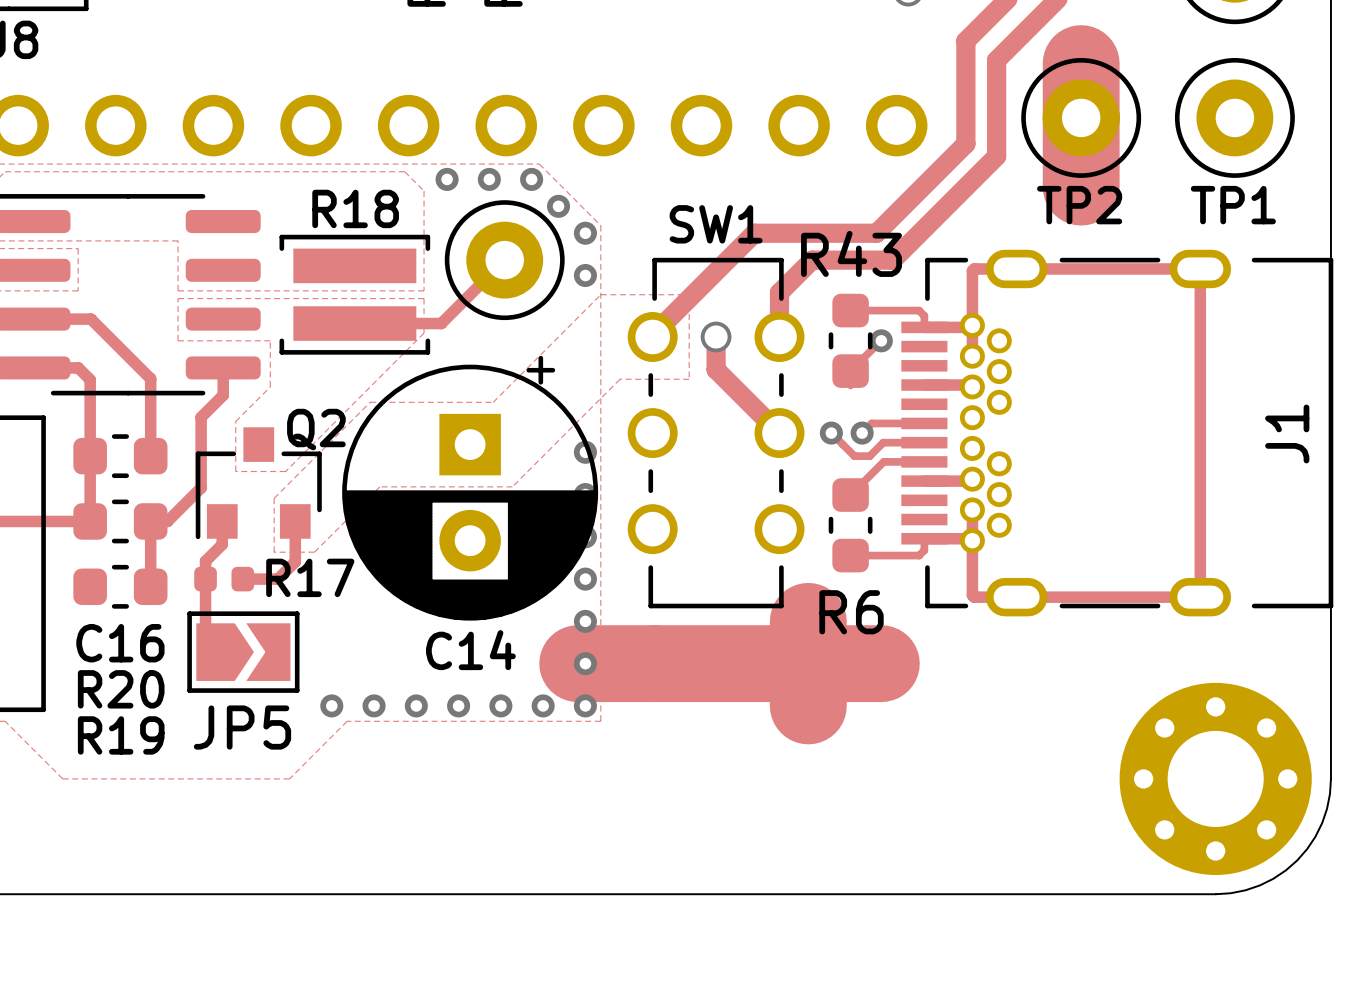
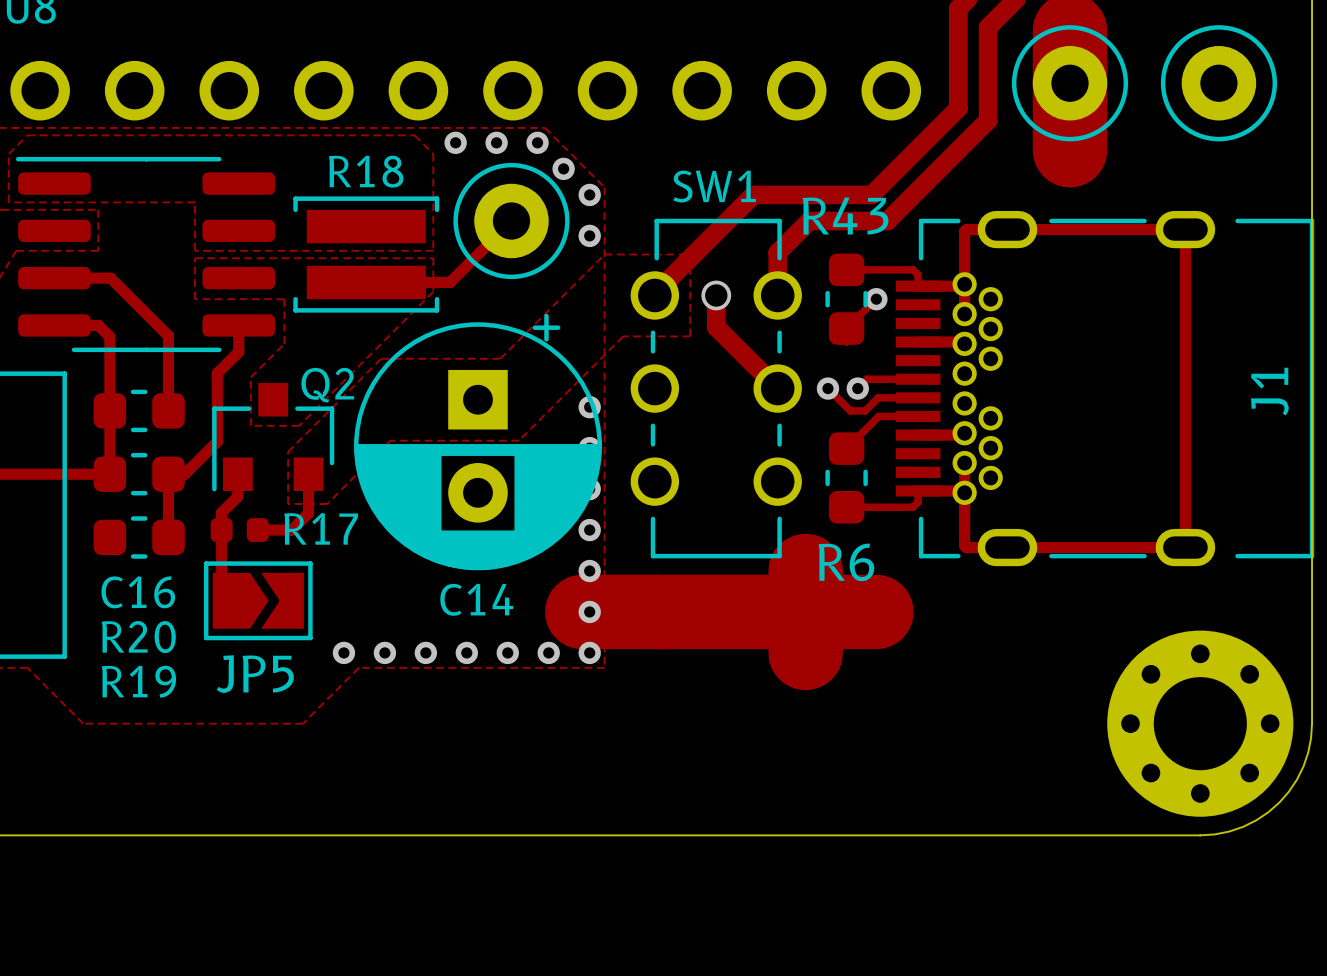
TP2 name: TP2 (1079, 205) -> none
TP1 name: TP1 (1233, 205) -> none

